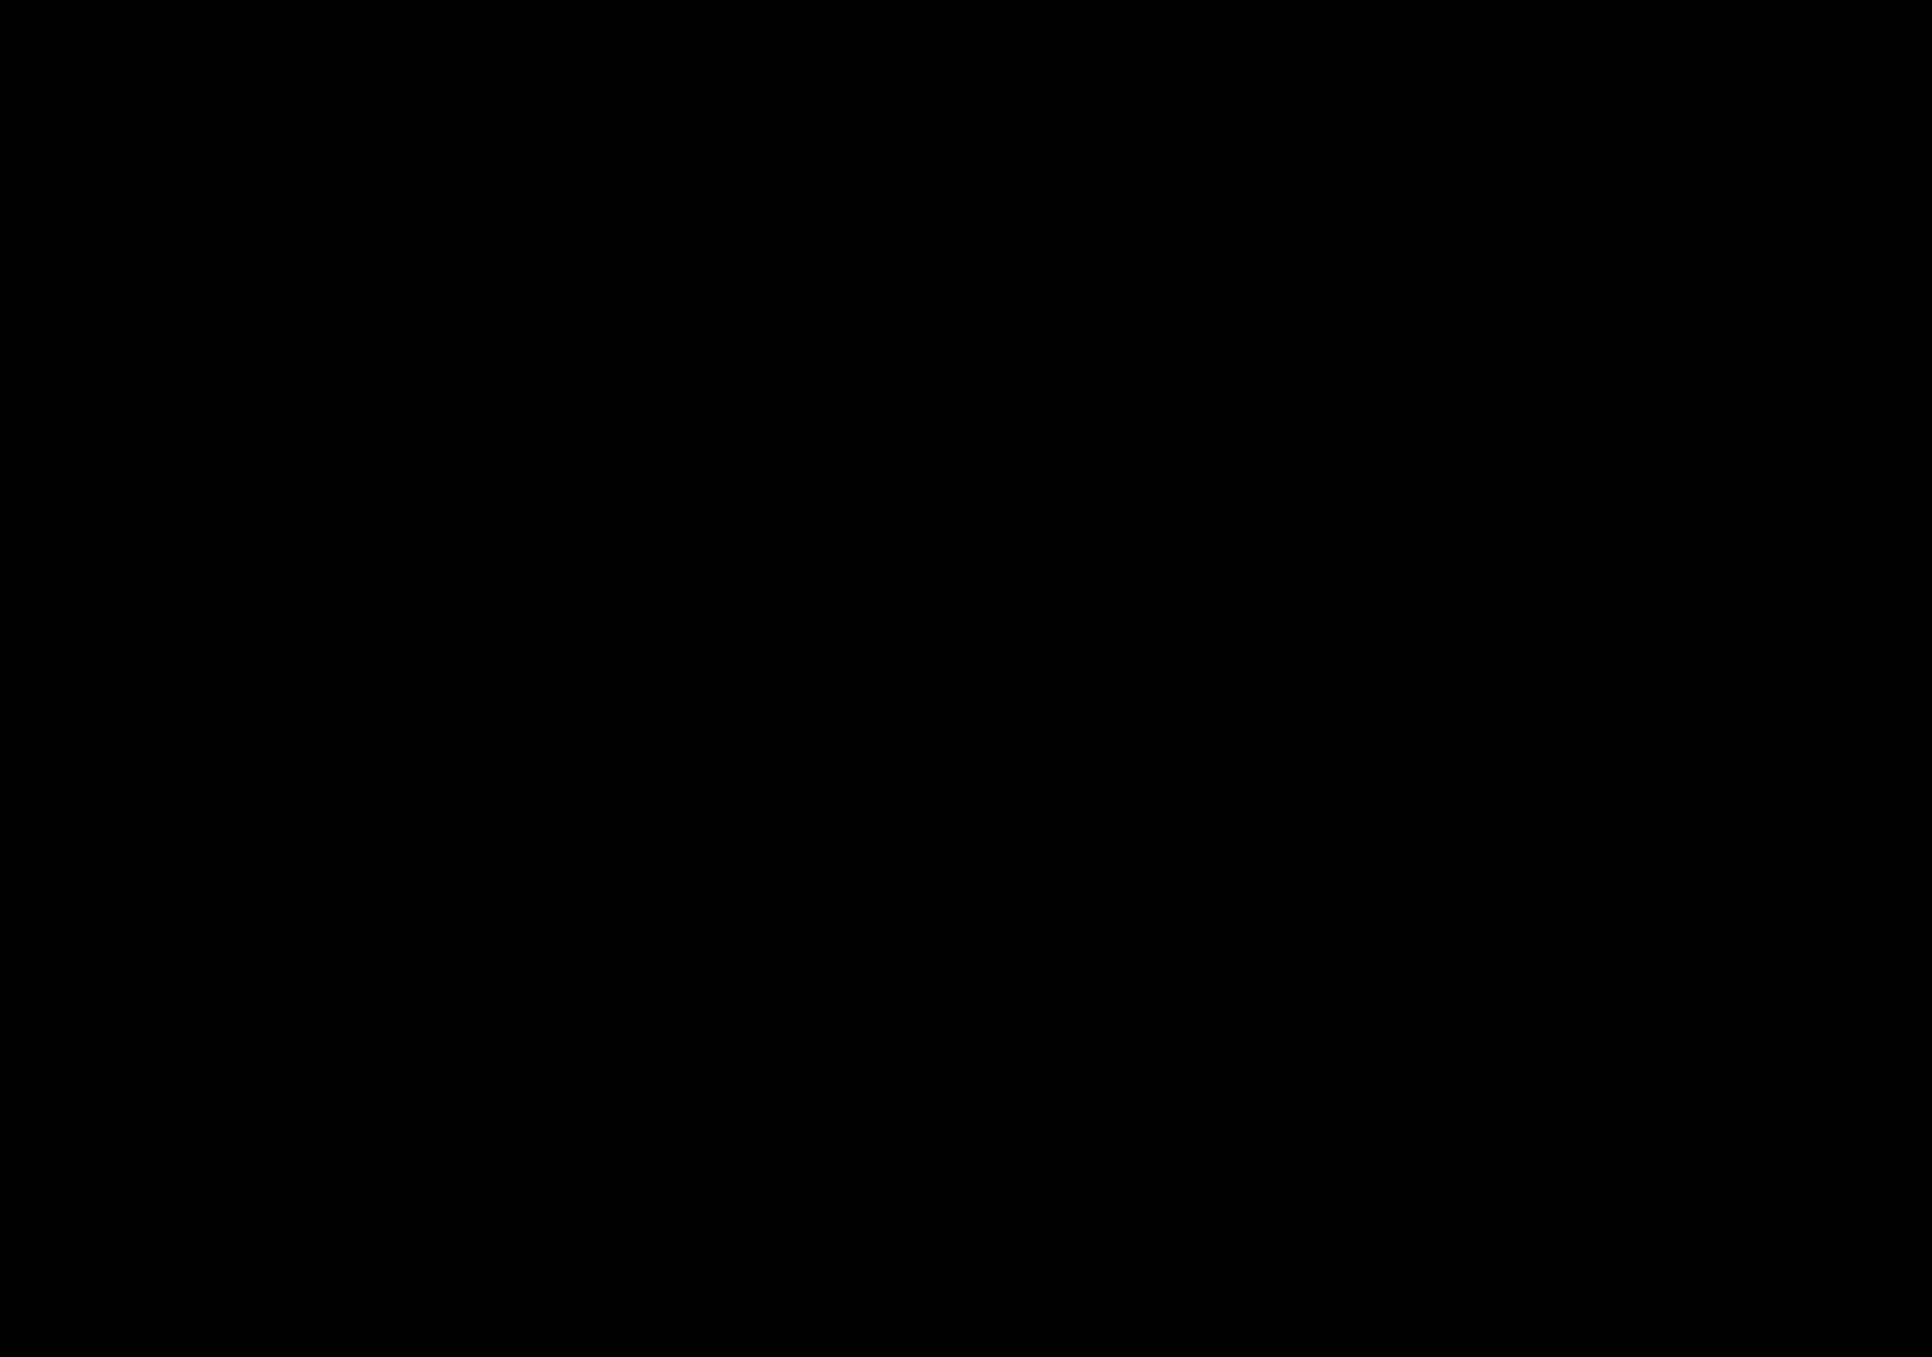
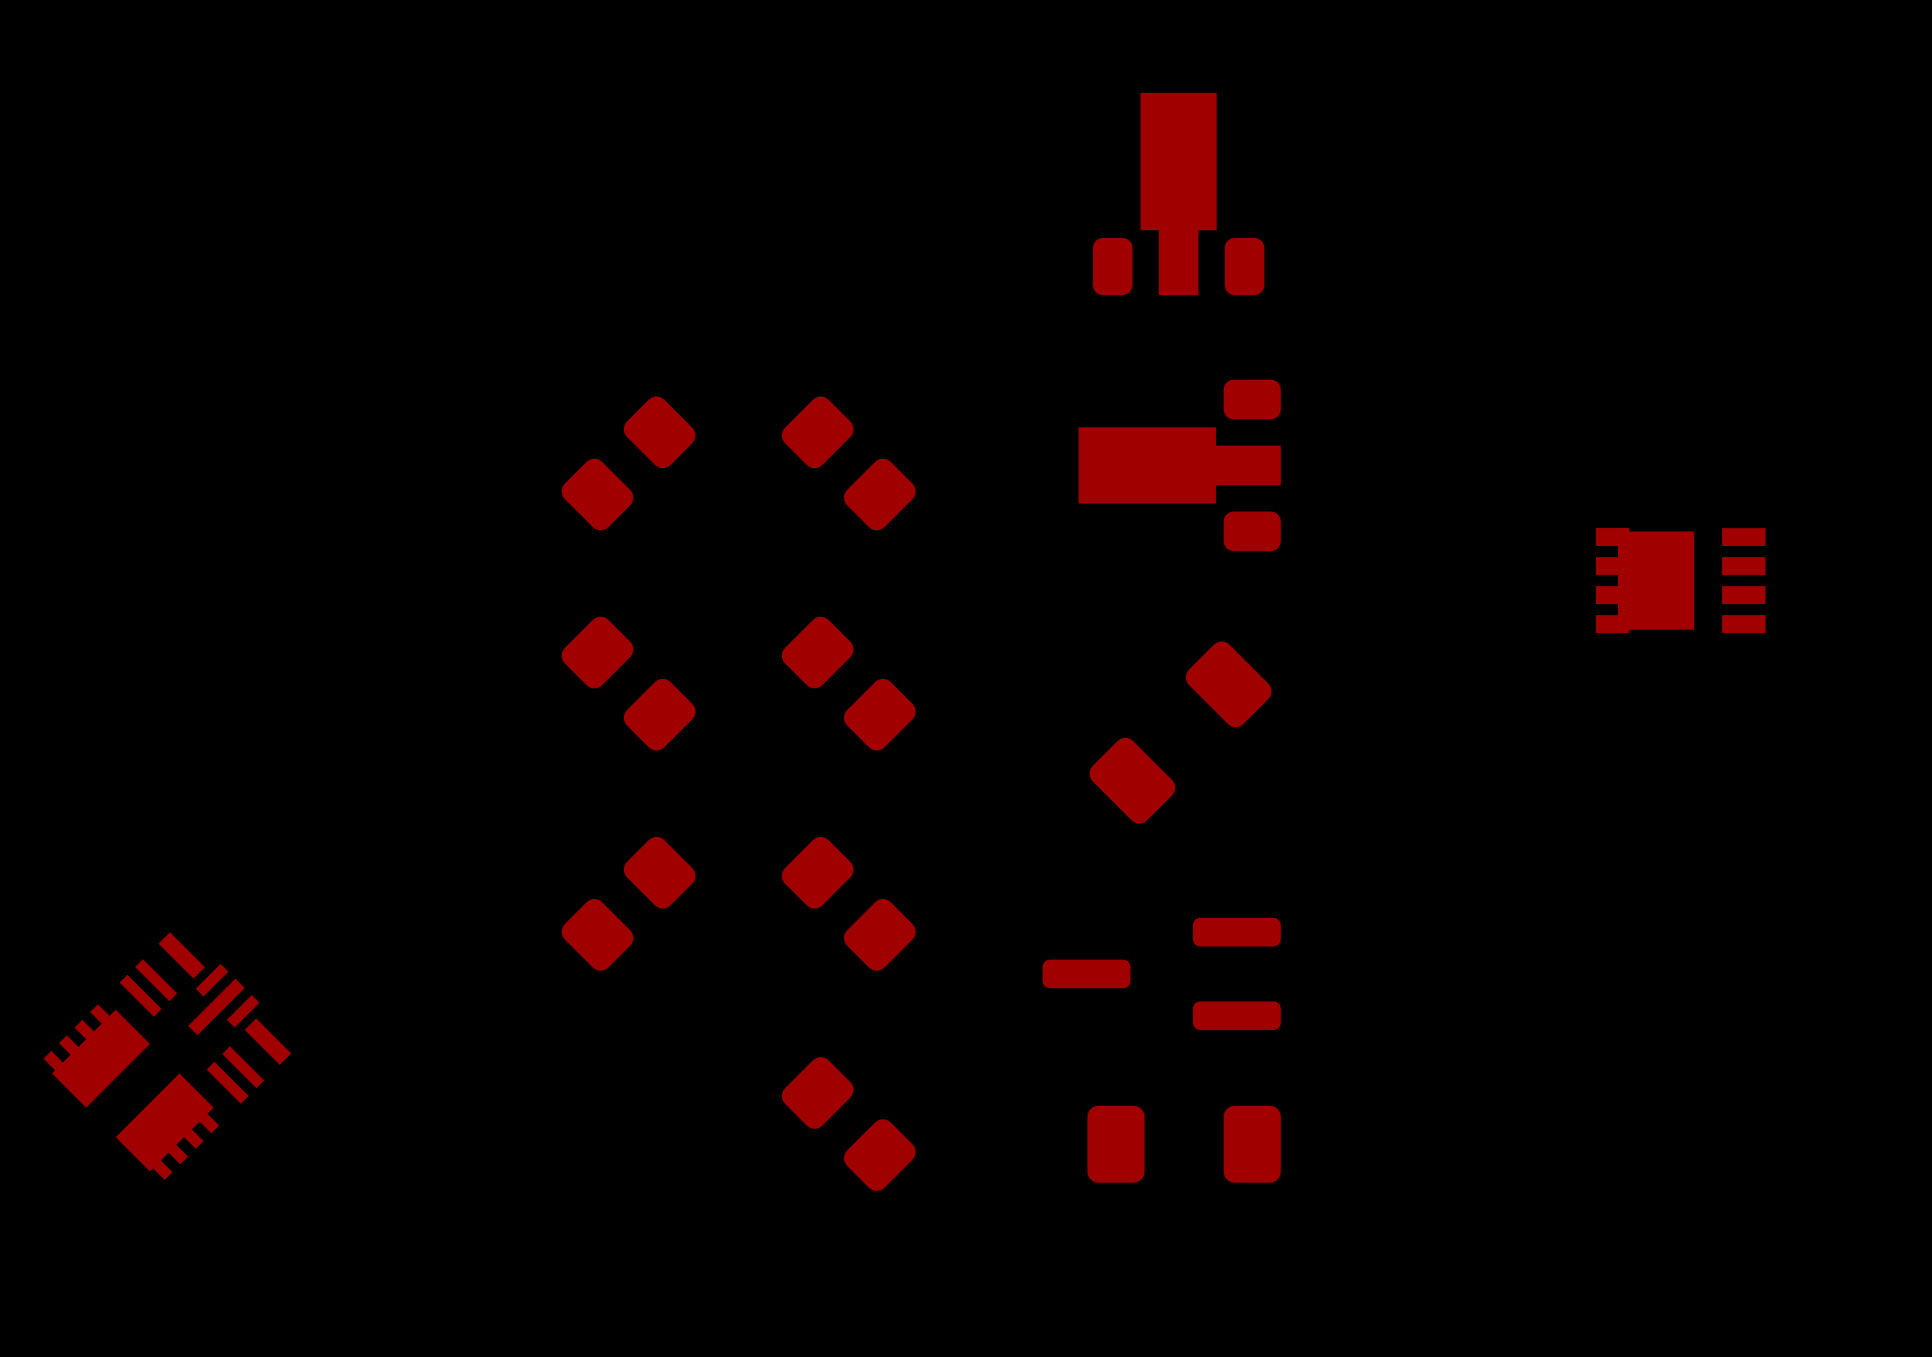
part: none -> (1178, 193)
part: none -> (628, 463)
part: none -> (848, 463)
part: none -> (1179, 465)
part: none -> (1680, 580)
part: none -> (628, 683)
part: none -> (848, 683)
part: none -> (1180, 732)
part: none -> (628, 903)
part: none -> (848, 903)
part: none -> (1161, 973)
part: none -> (167, 1056)
part: none -> (848, 1123)
part: none -> (1184, 1144)

